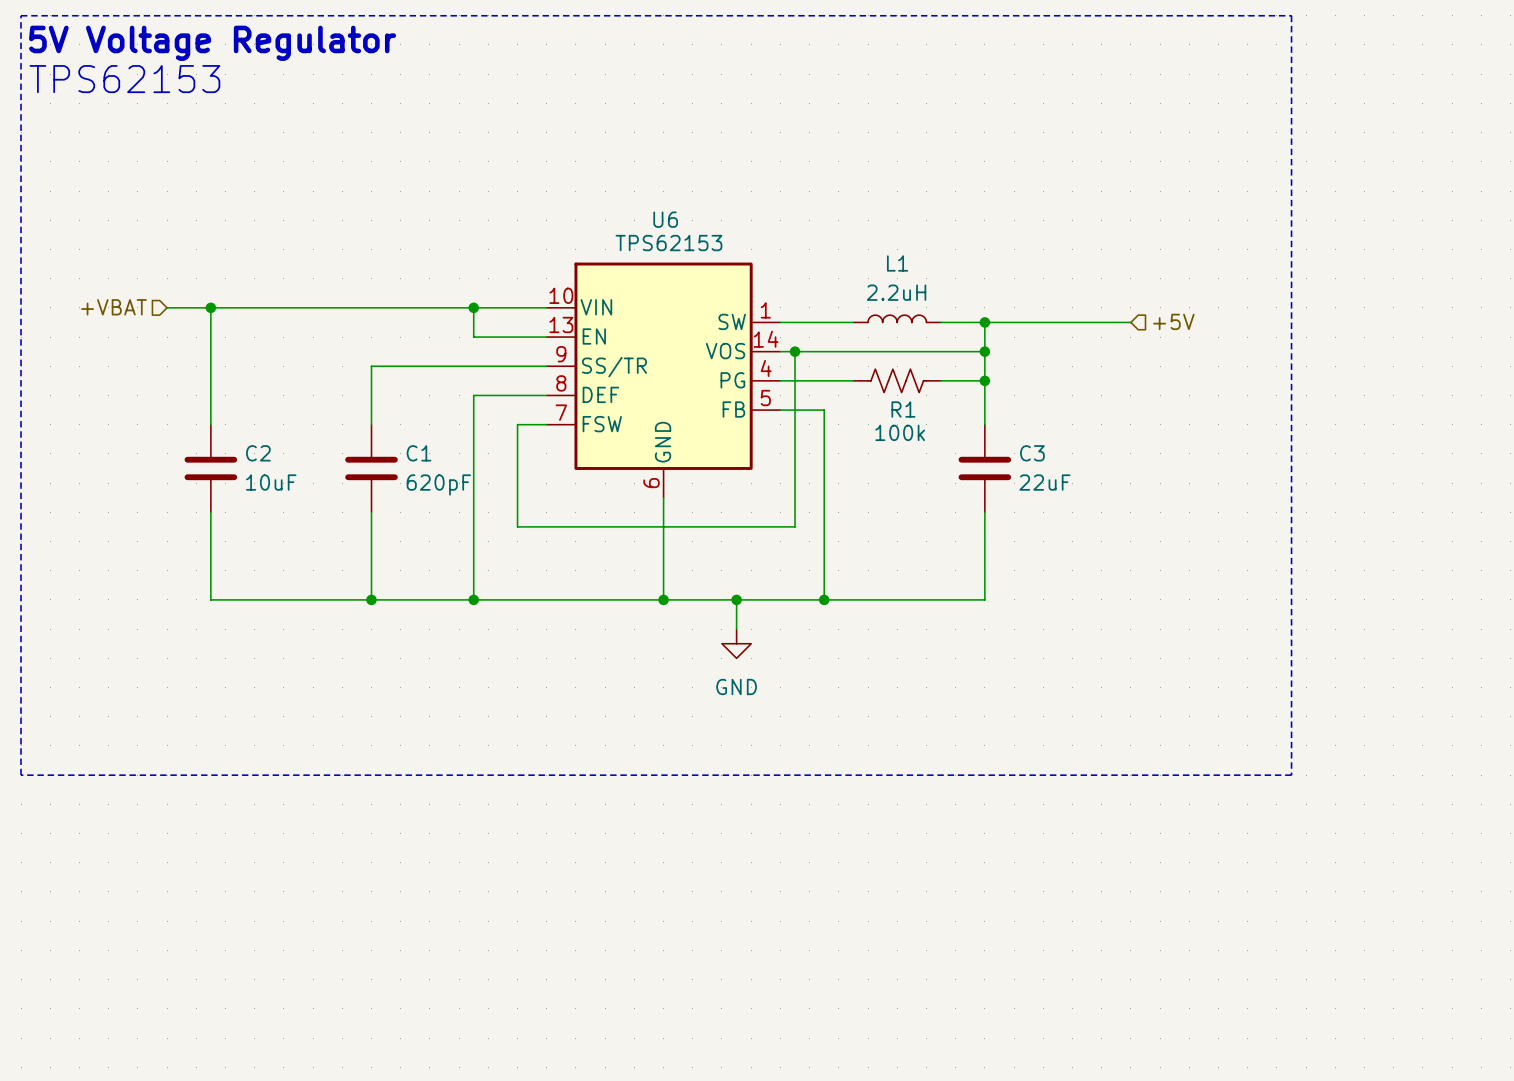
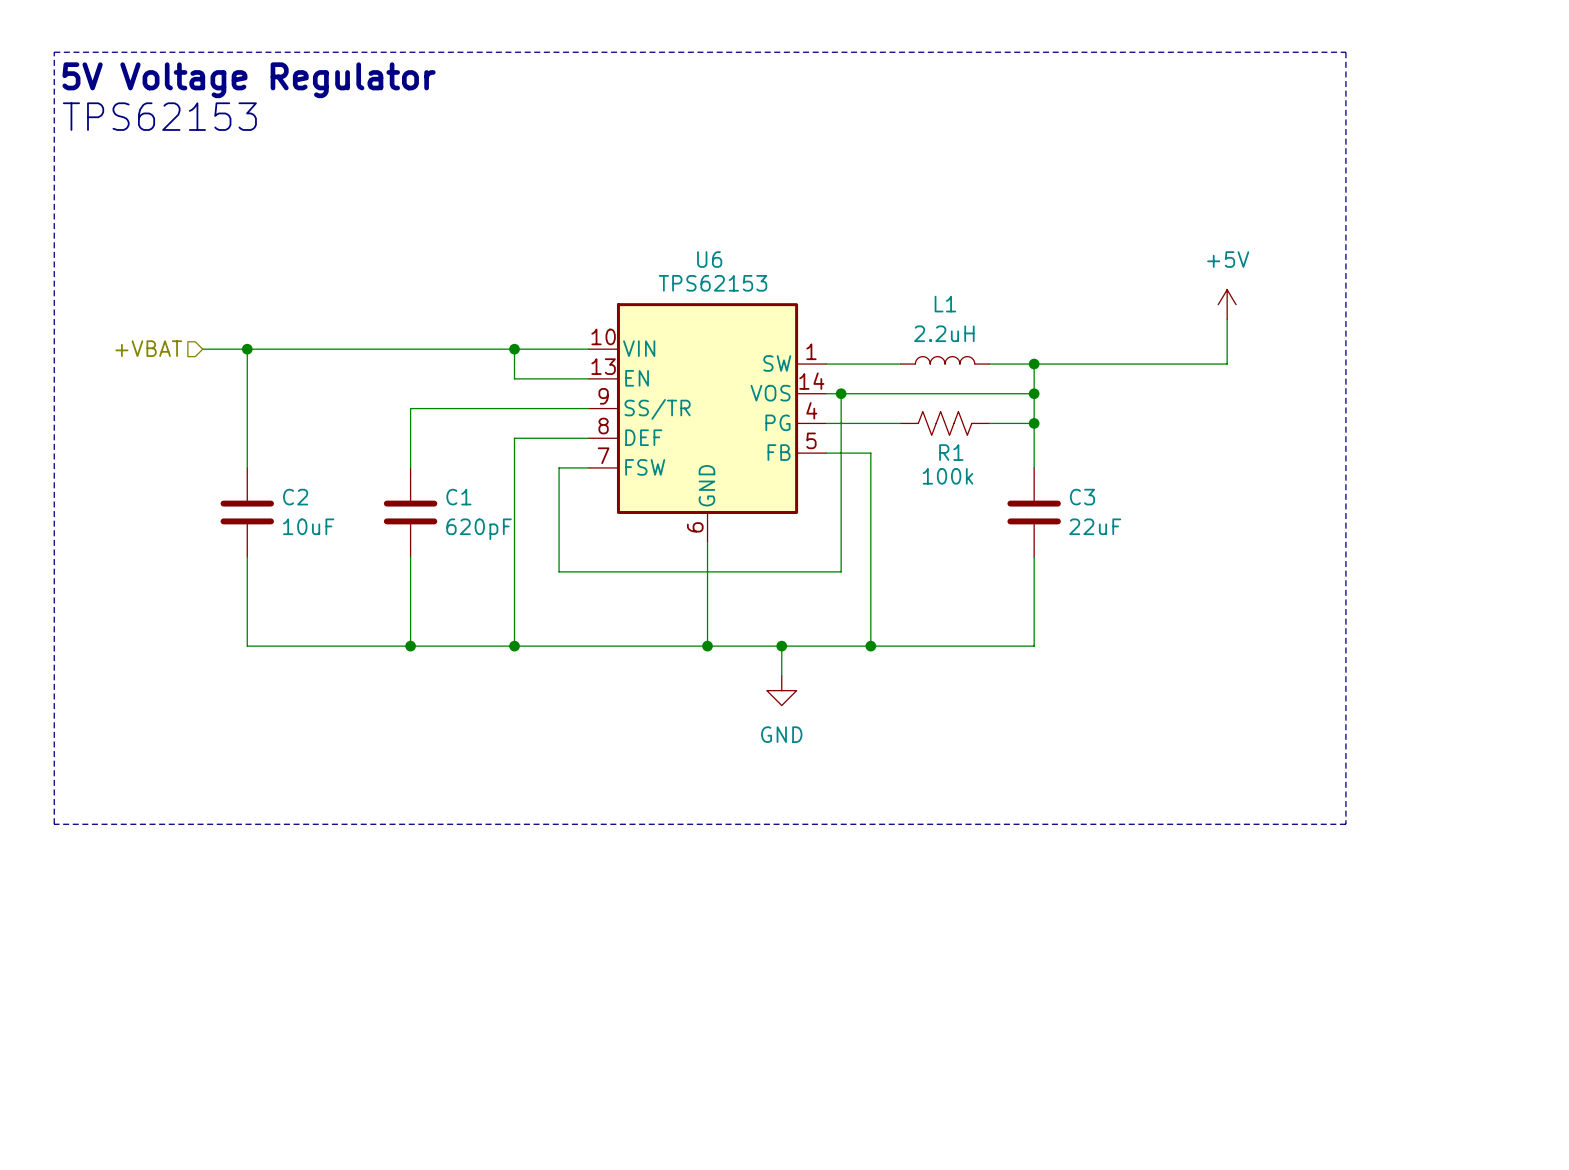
power symbol: none -> +5V (1227, 304)
wire: none -> (1227, 319) (1227, 364) (1182, 364)
hierarchical label: +5V (1173, 321) -> none

